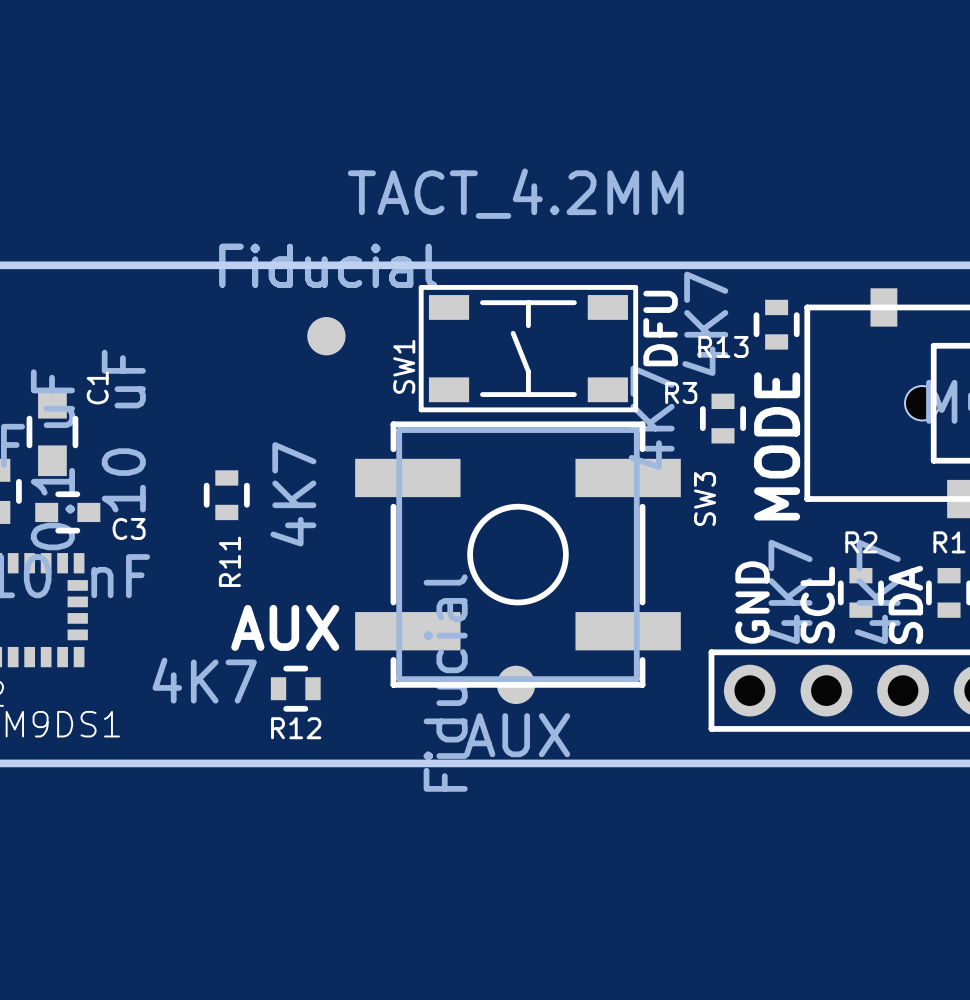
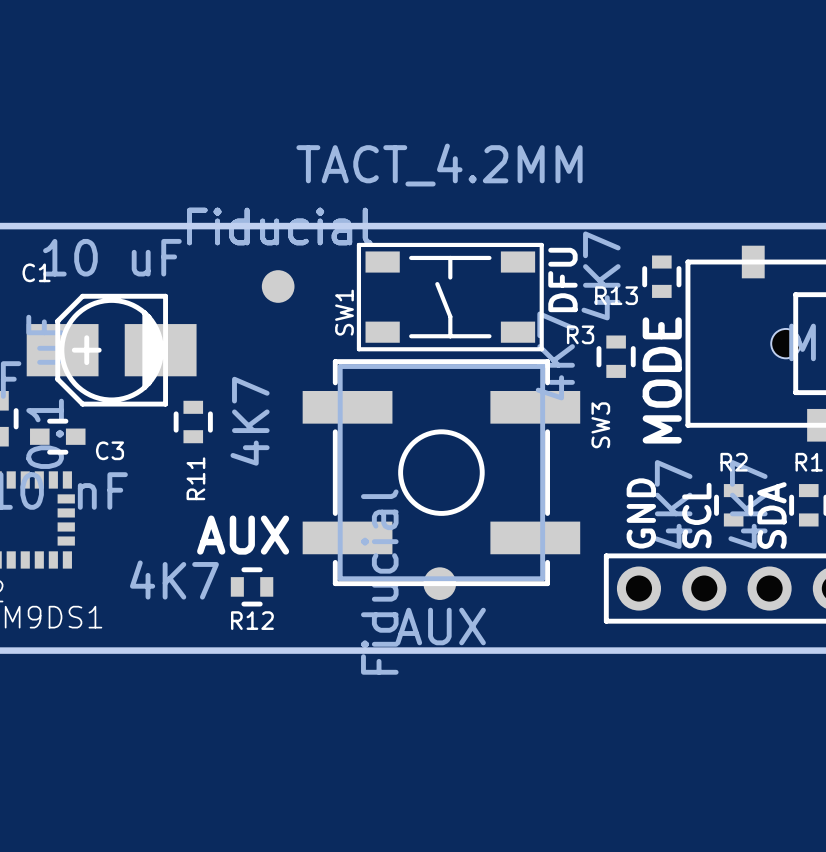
C1 footprint: [26, 387, 79, 477] -> [26, 293, 197, 407]
C1 name position: C1 (97, 387) -> C1 (36, 272)
C1 value position: 10 uF (123, 431) -> 10 uF (112, 257)

